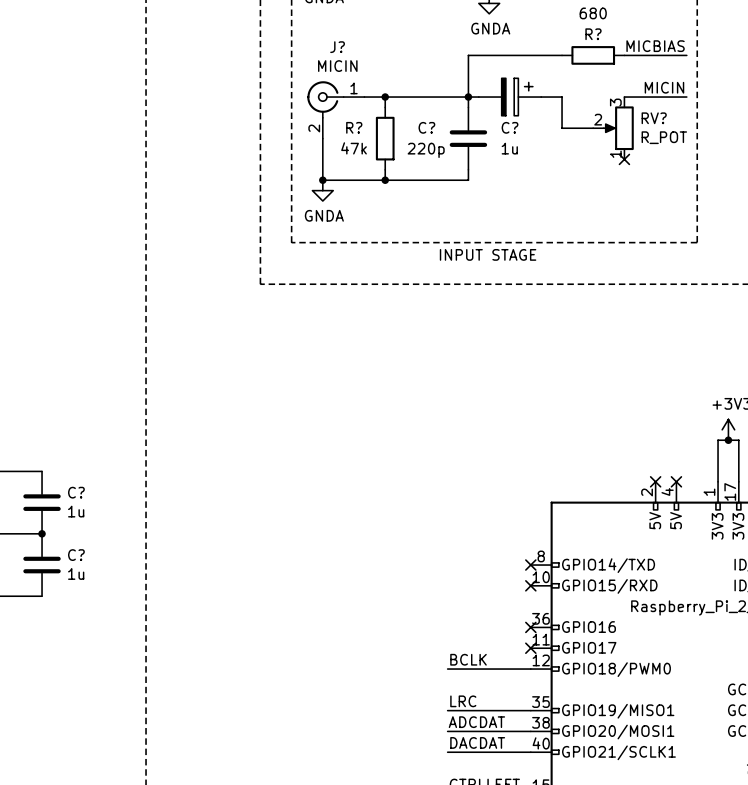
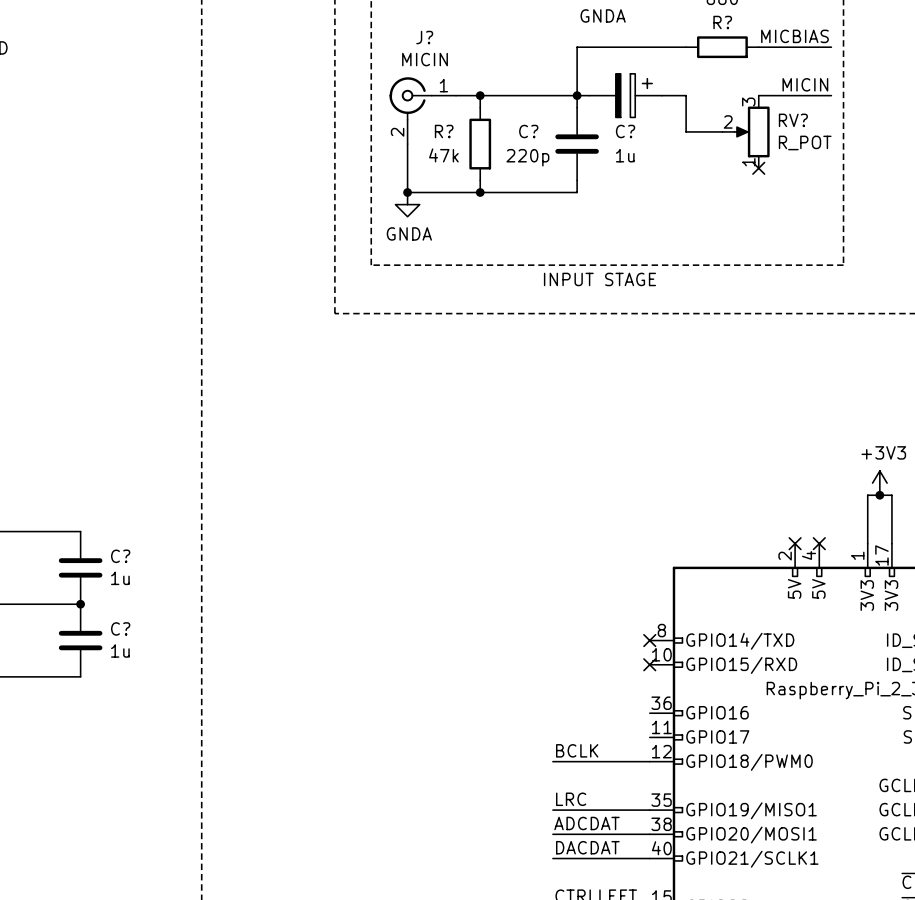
no-connect mark: (530, 627) -> none
no-connect mark: (530, 648) -> none

